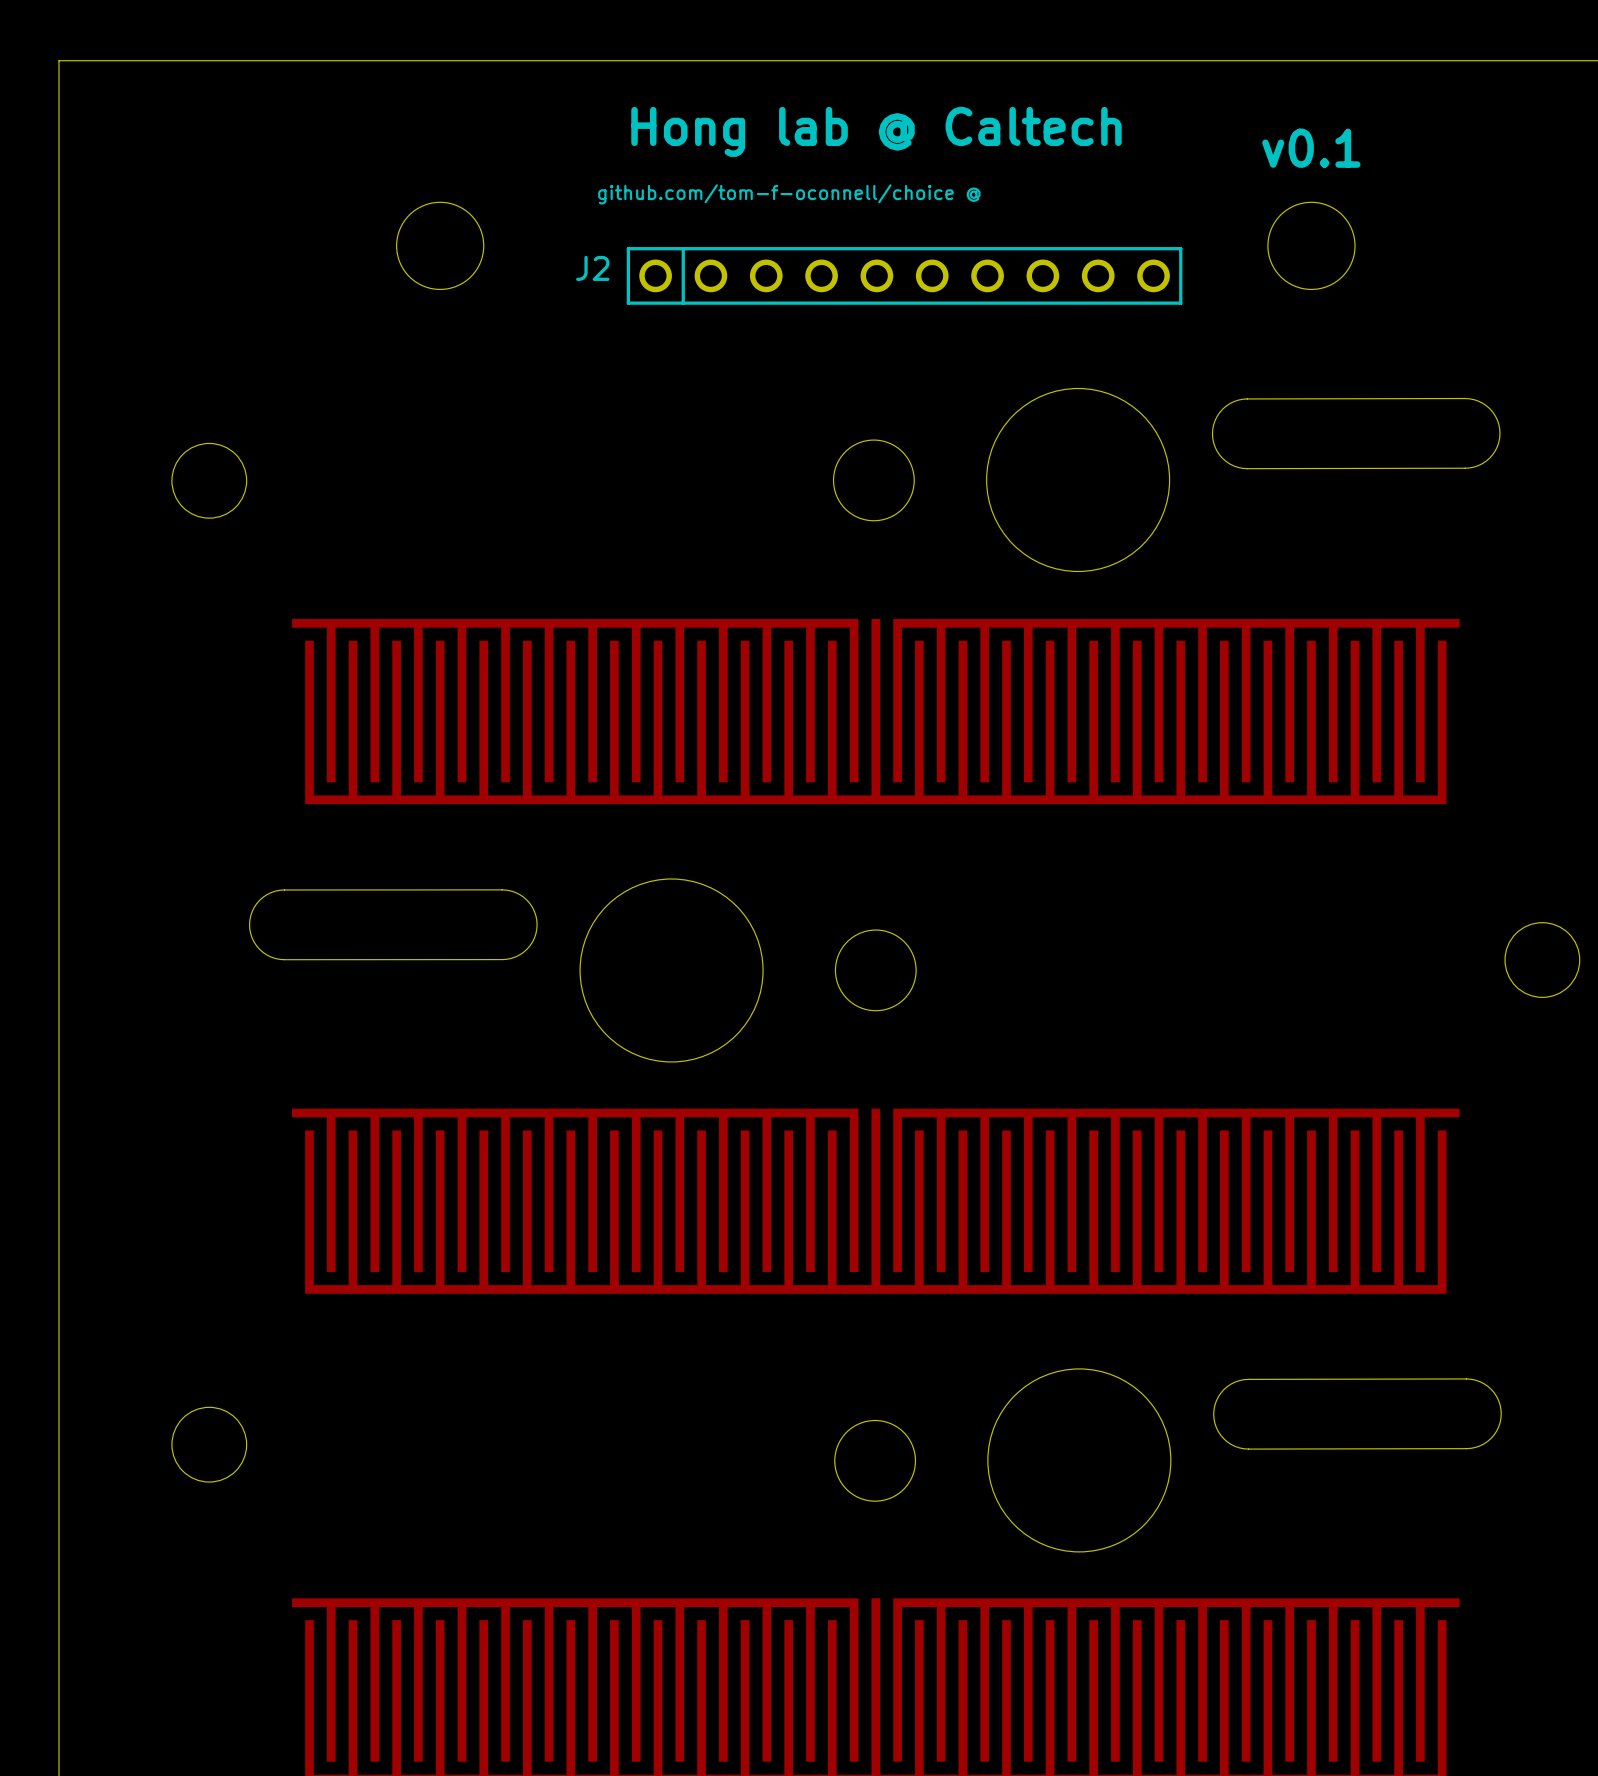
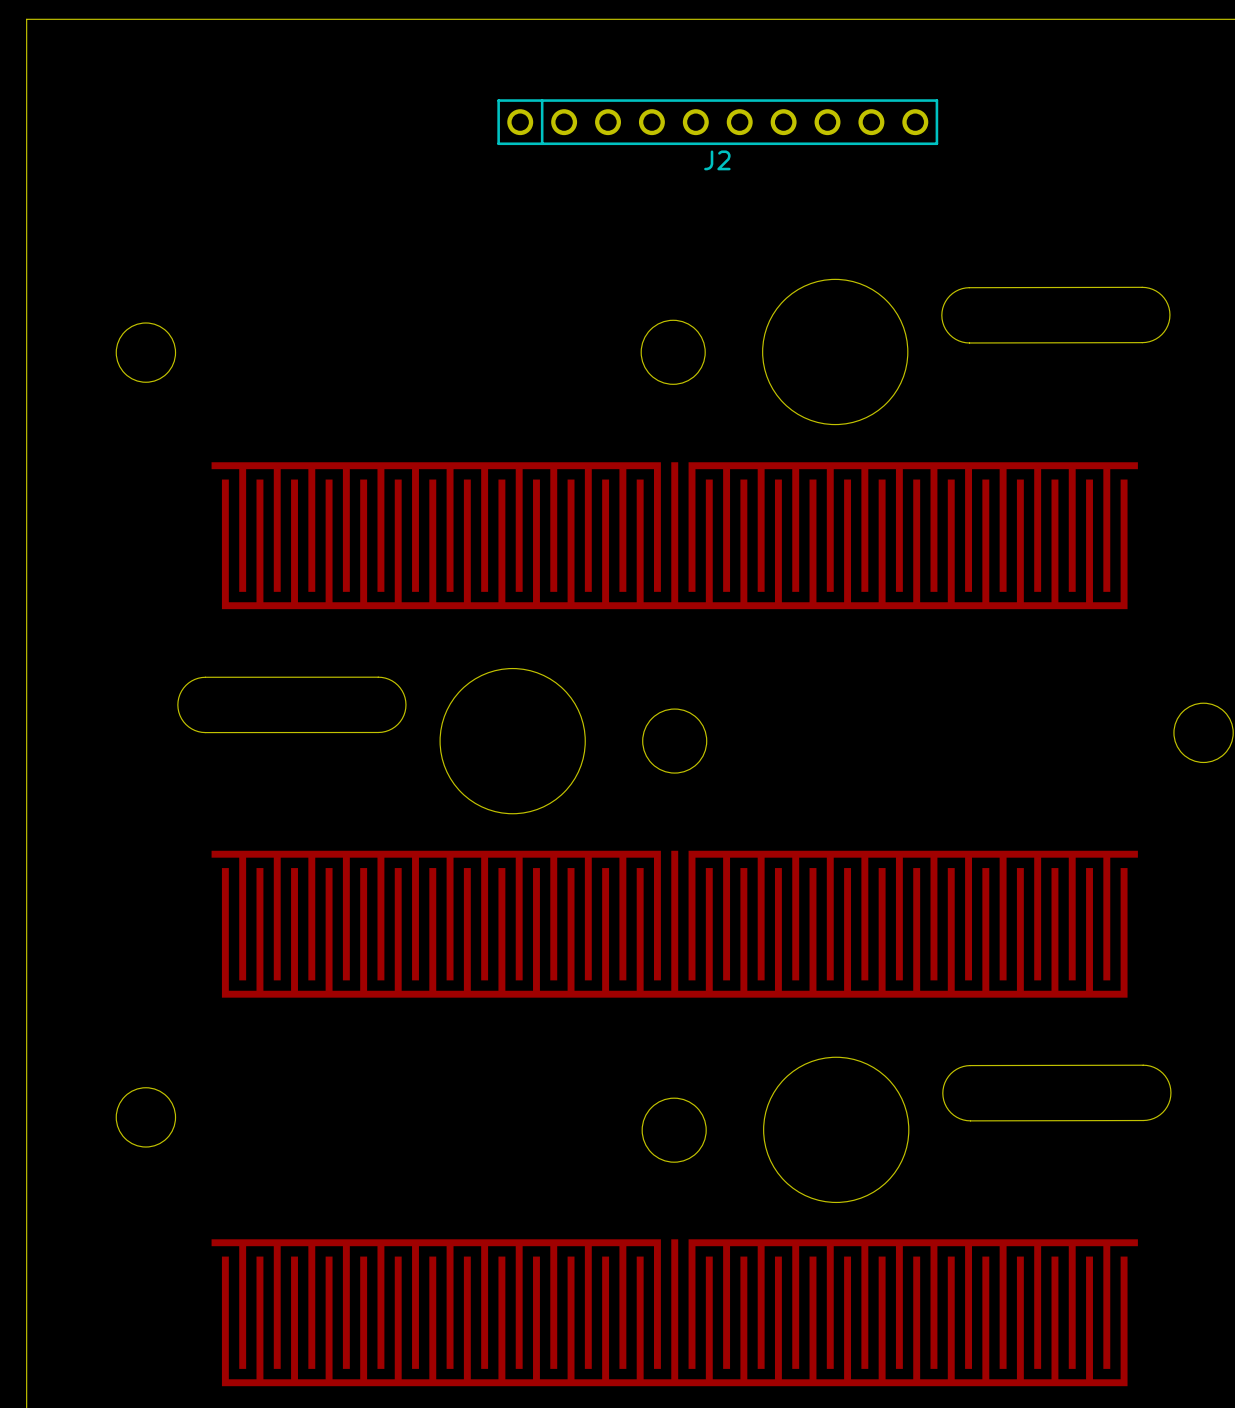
text: Hong lab @ Caltech (876, 131) -> none
text: v0.1 (1311, 148) -> none
text: github.com/tom-f-oconnell/choice @ (789, 194) -> none
round board edge: [396, 202, 484, 290] -> none
round board edge: [1267, 202, 1356, 290] -> none
J2 name position: J2 (592, 268) -> J2 (717, 160)
J2 position: (904, 275) -> (717, 122)

